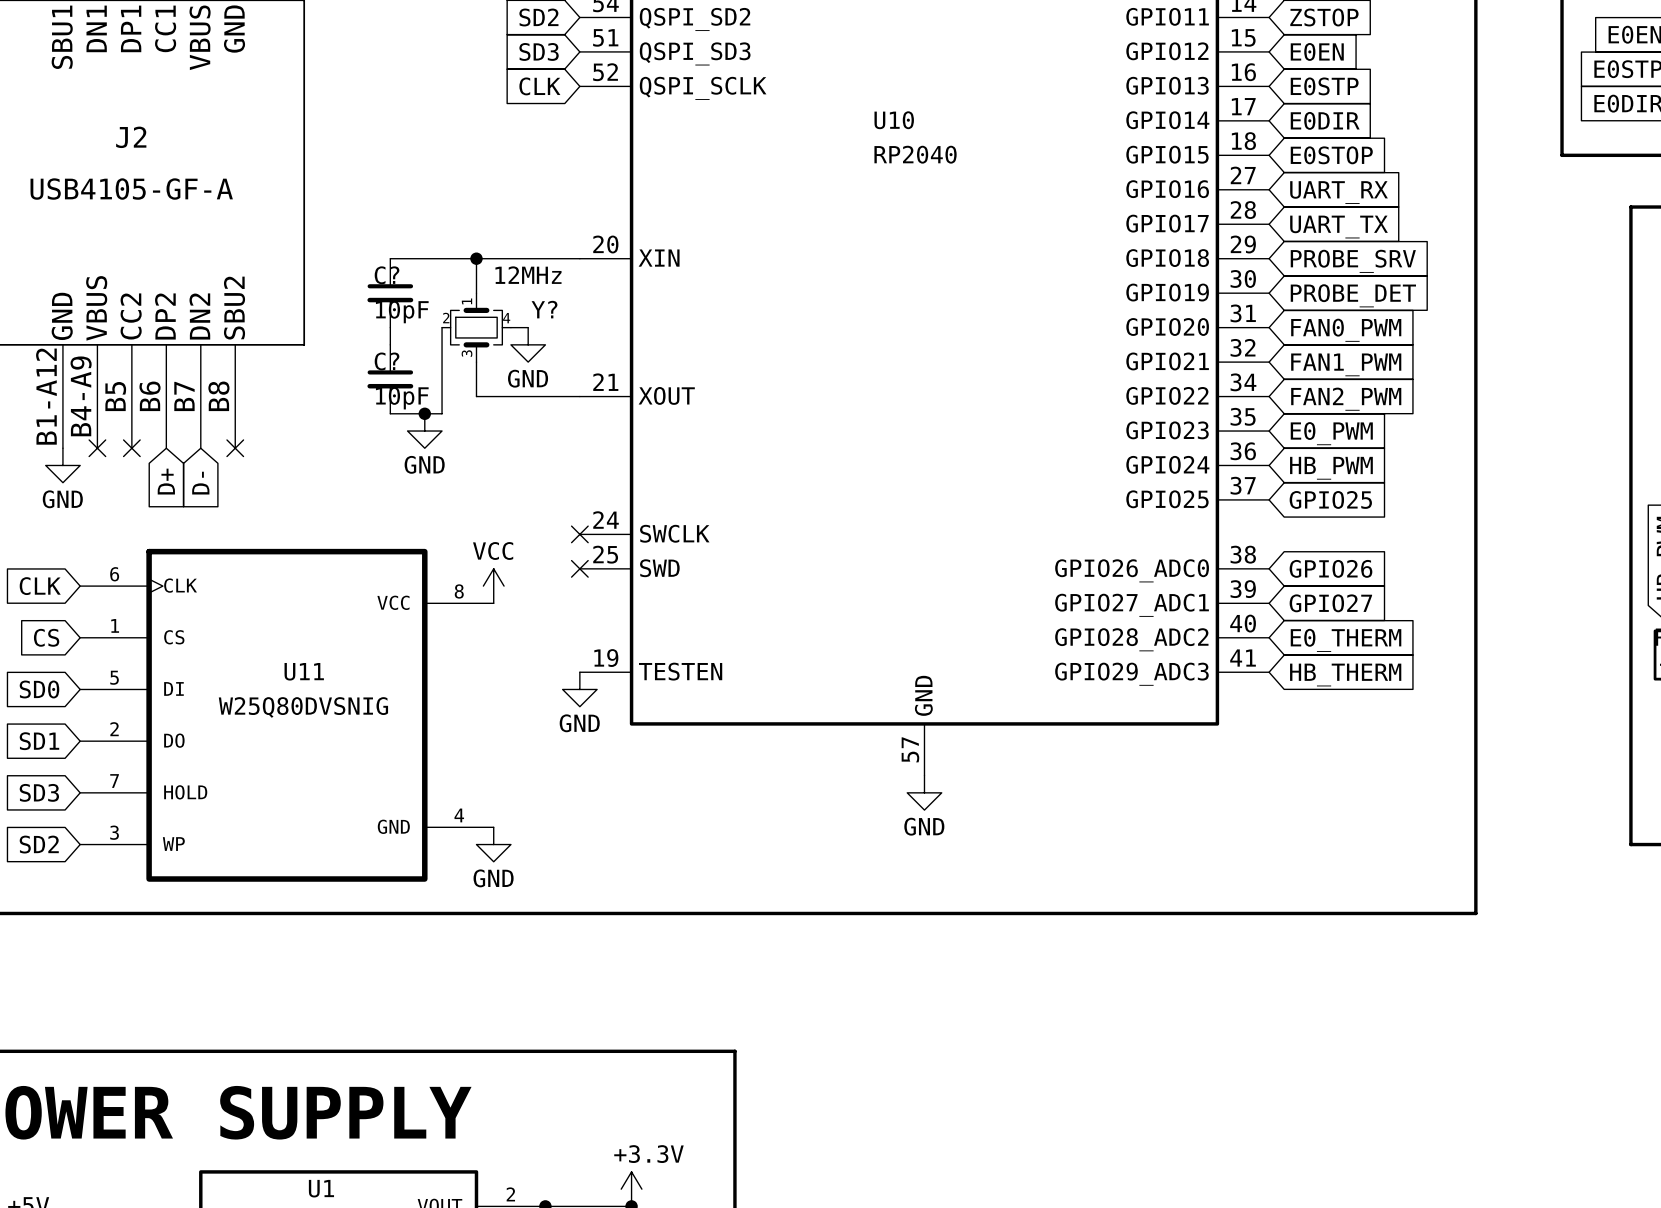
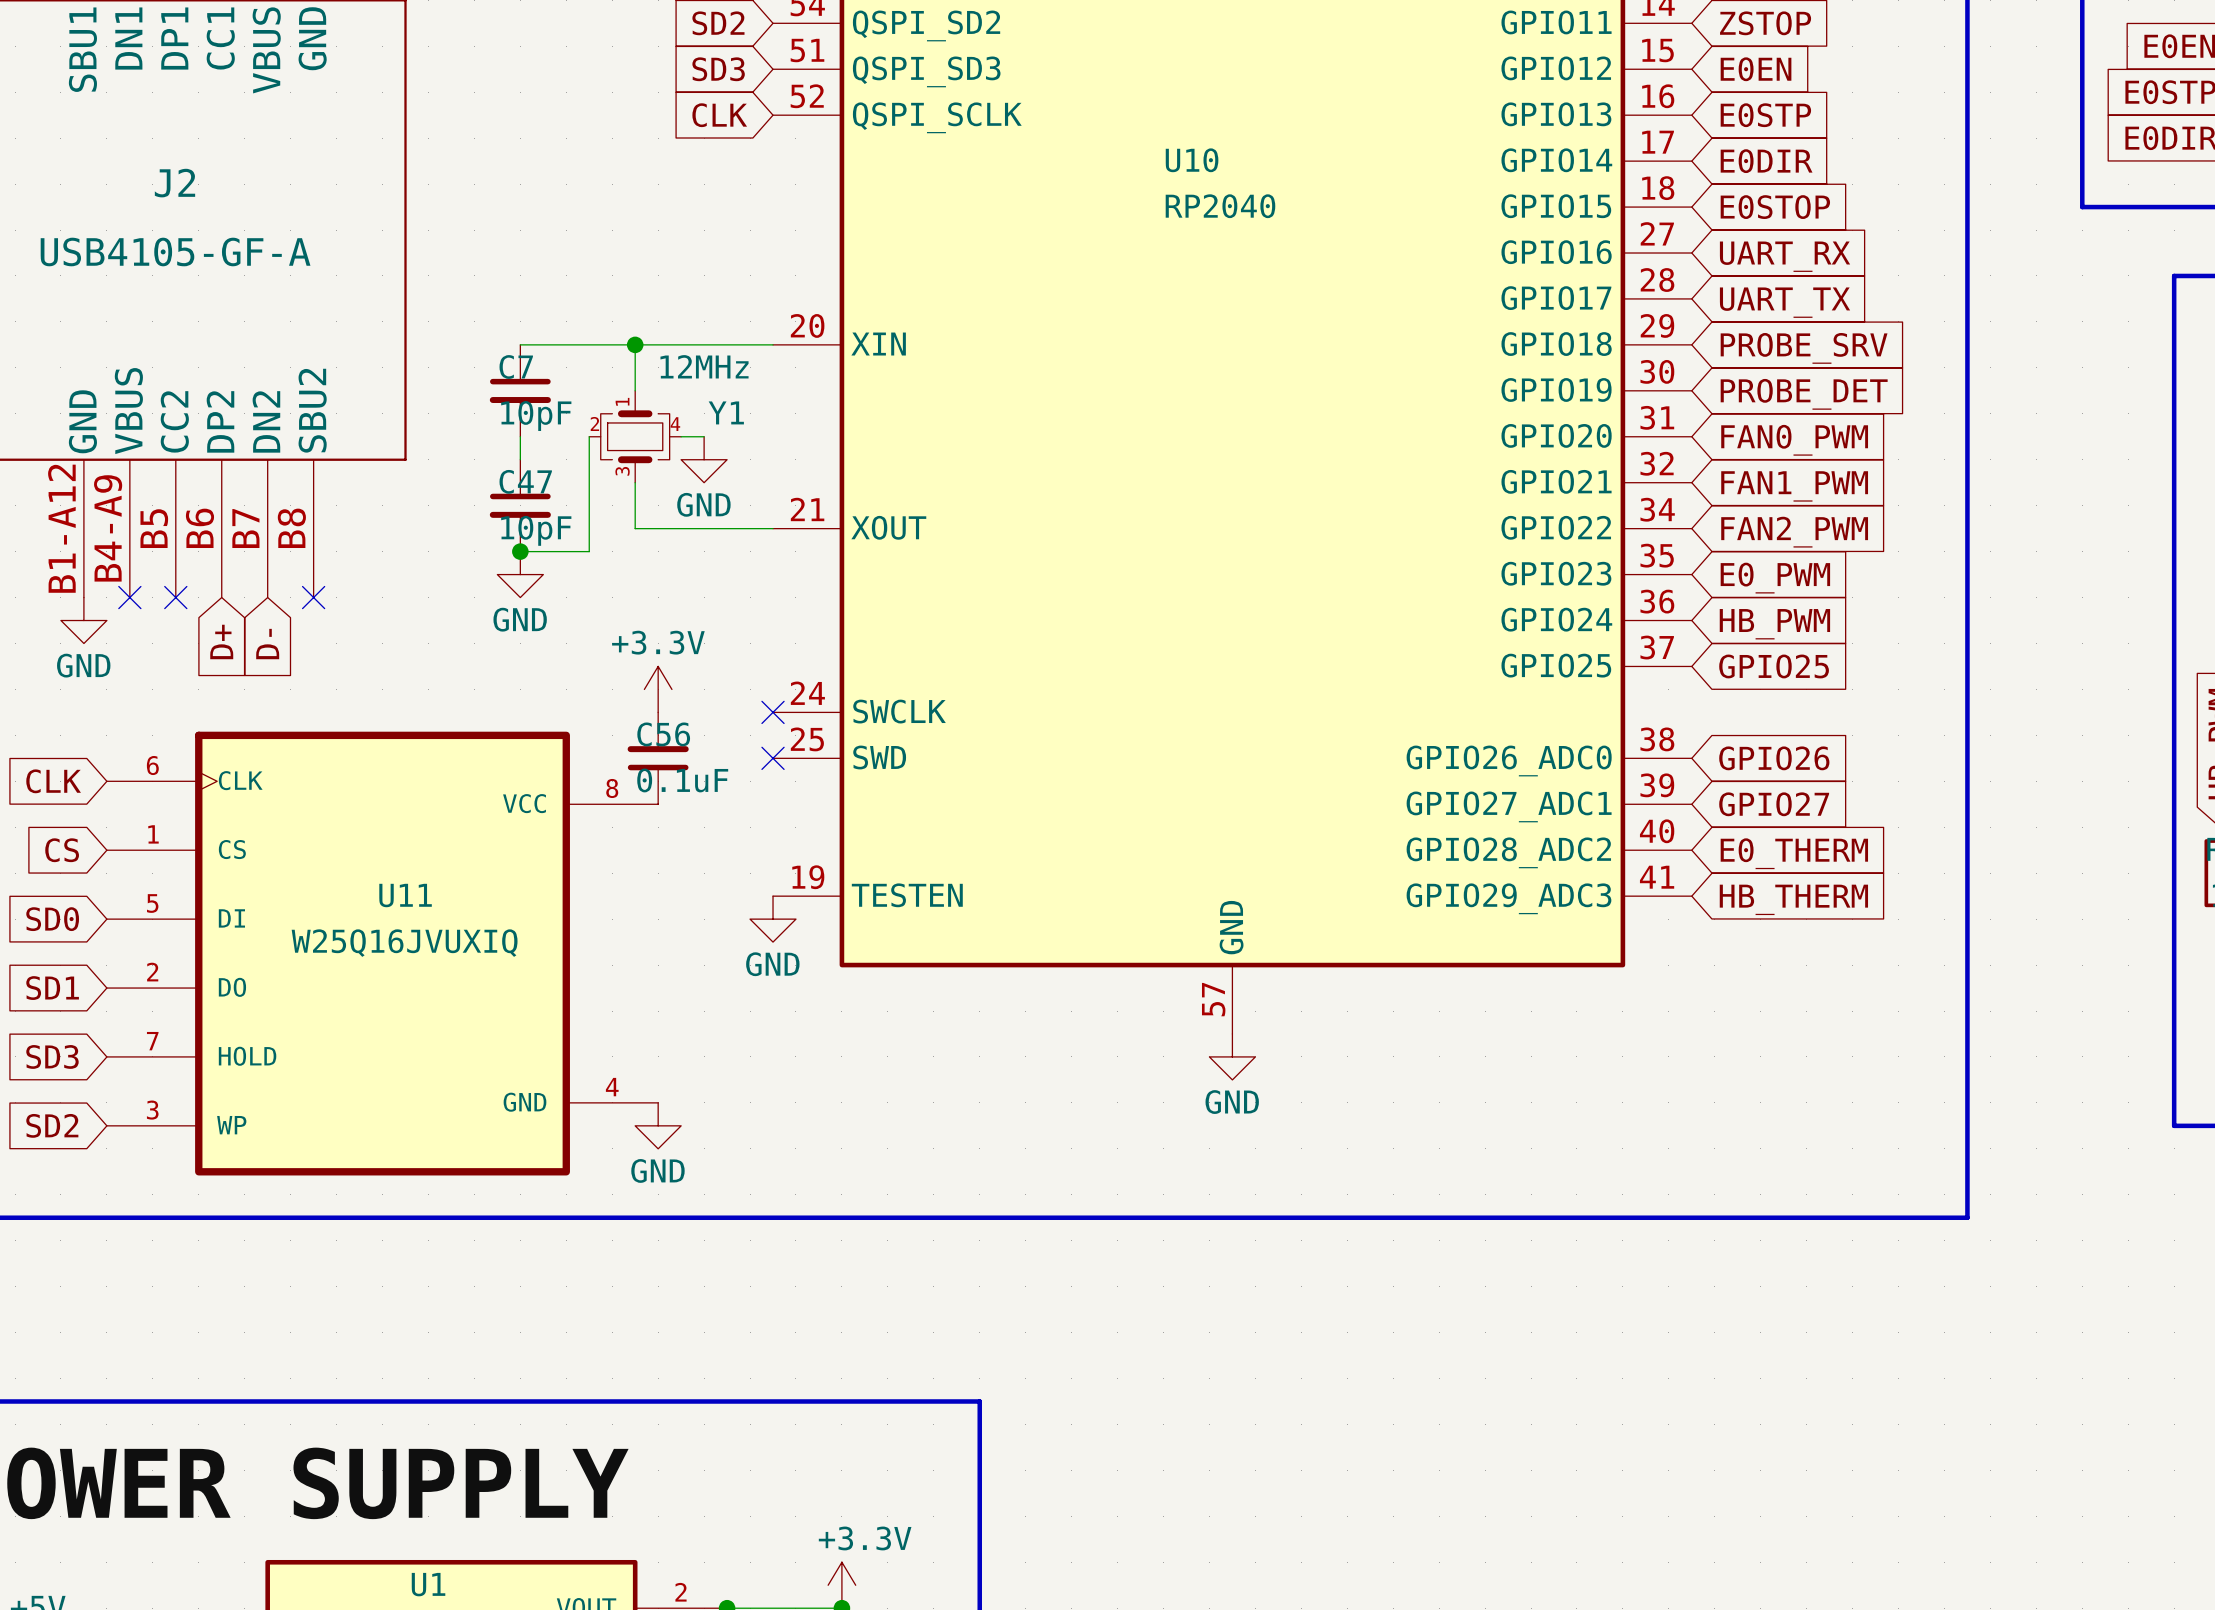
C? name: C? (387, 275) -> C7 (516, 367)
Y? name: Y? (544, 309) -> Y1 (726, 412)
C? name: C? (387, 361) -> C47 (525, 481)
junction position: (424, 413) -> (520, 551)
power symbol position: GND (424, 431) -> GND (520, 574)
power symbol: none -> +3.3V (658, 689)
C56: none -> 0.1uF (658, 758)
power symbol: VCC (493, 586) -> none
U11 value: W25Q80DVSNIG (303, 707) -> W25Q16JVUXIQ (404, 943)

